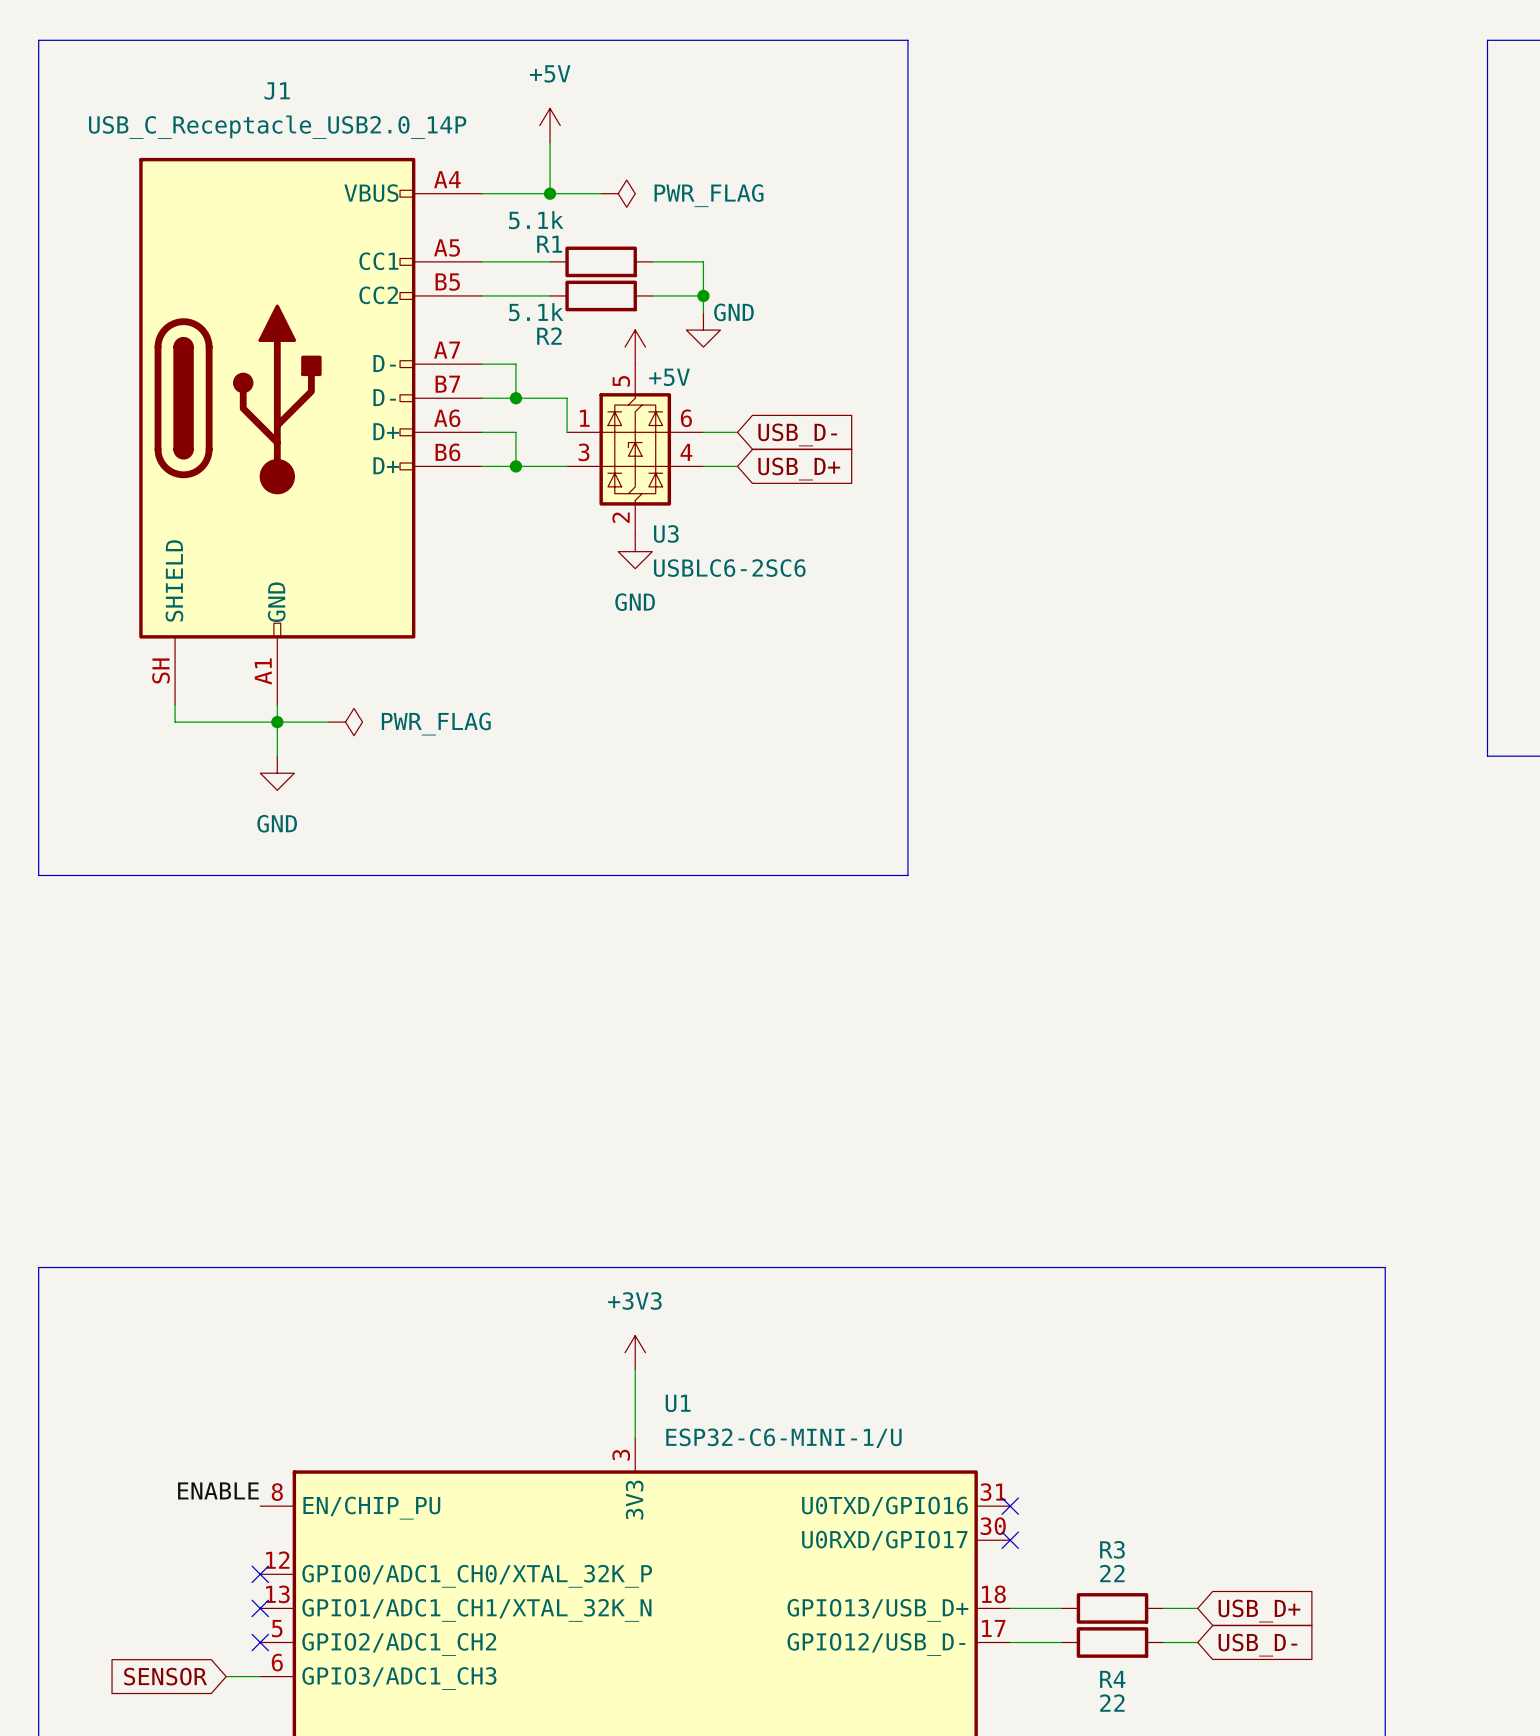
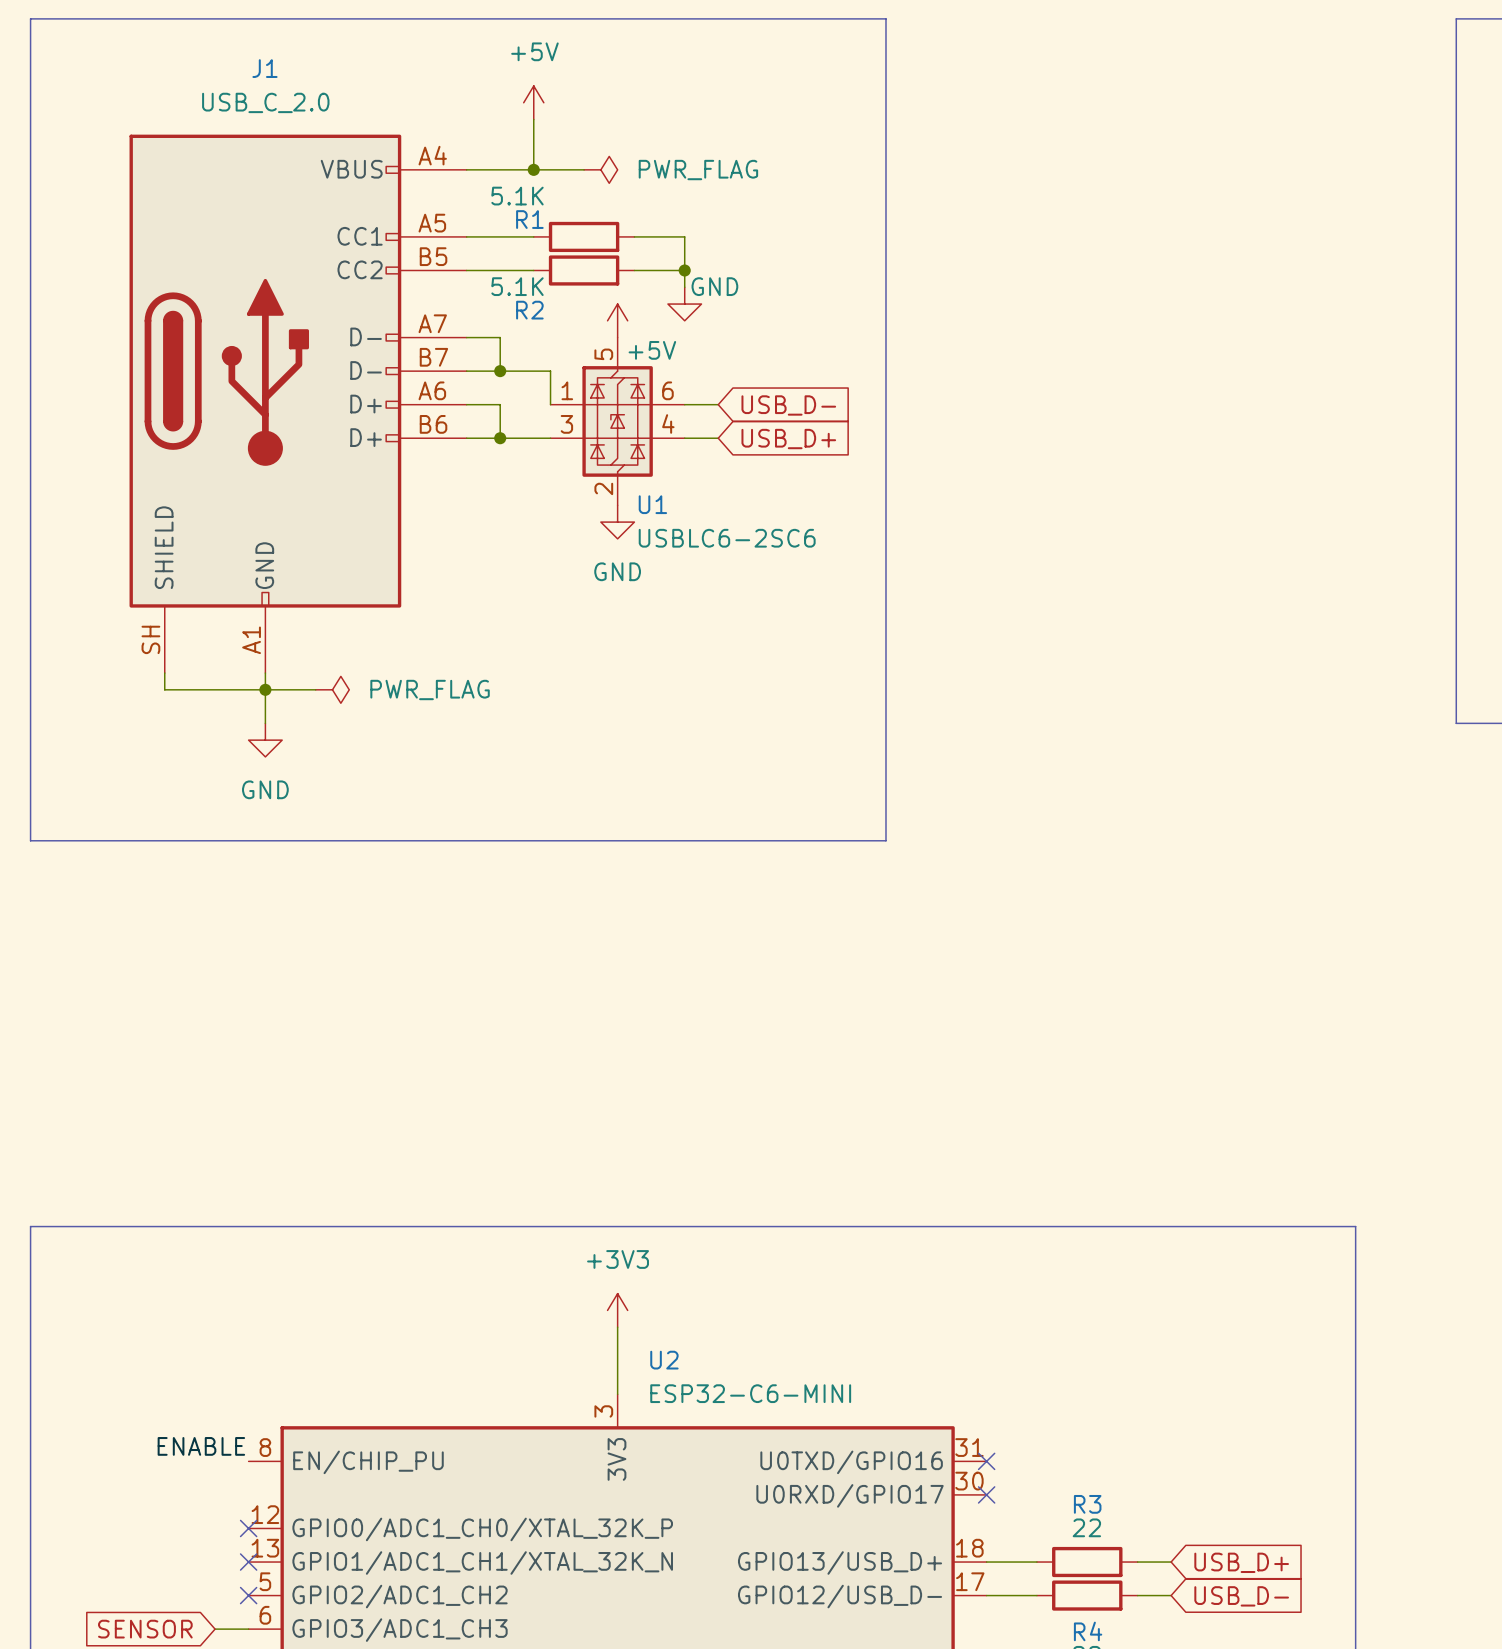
J1 value: USB_C_Receptacle_USB2.0_14P (277, 127) -> USB_C_2.0 (265, 102)
R1 value: 5.1k (536, 220) -> 5.1K (517, 196)
R2 value: 5.1k (536, 312) -> 5.1K (517, 286)
U3 name: U3 (666, 533) -> U1 (652, 504)
U1 name: U1 (678, 1403) -> U2 (664, 1360)
U1 value: ESP32-C6-MINI-1/U (783, 1438) -> ESP32-C6-MINI (750, 1393)

